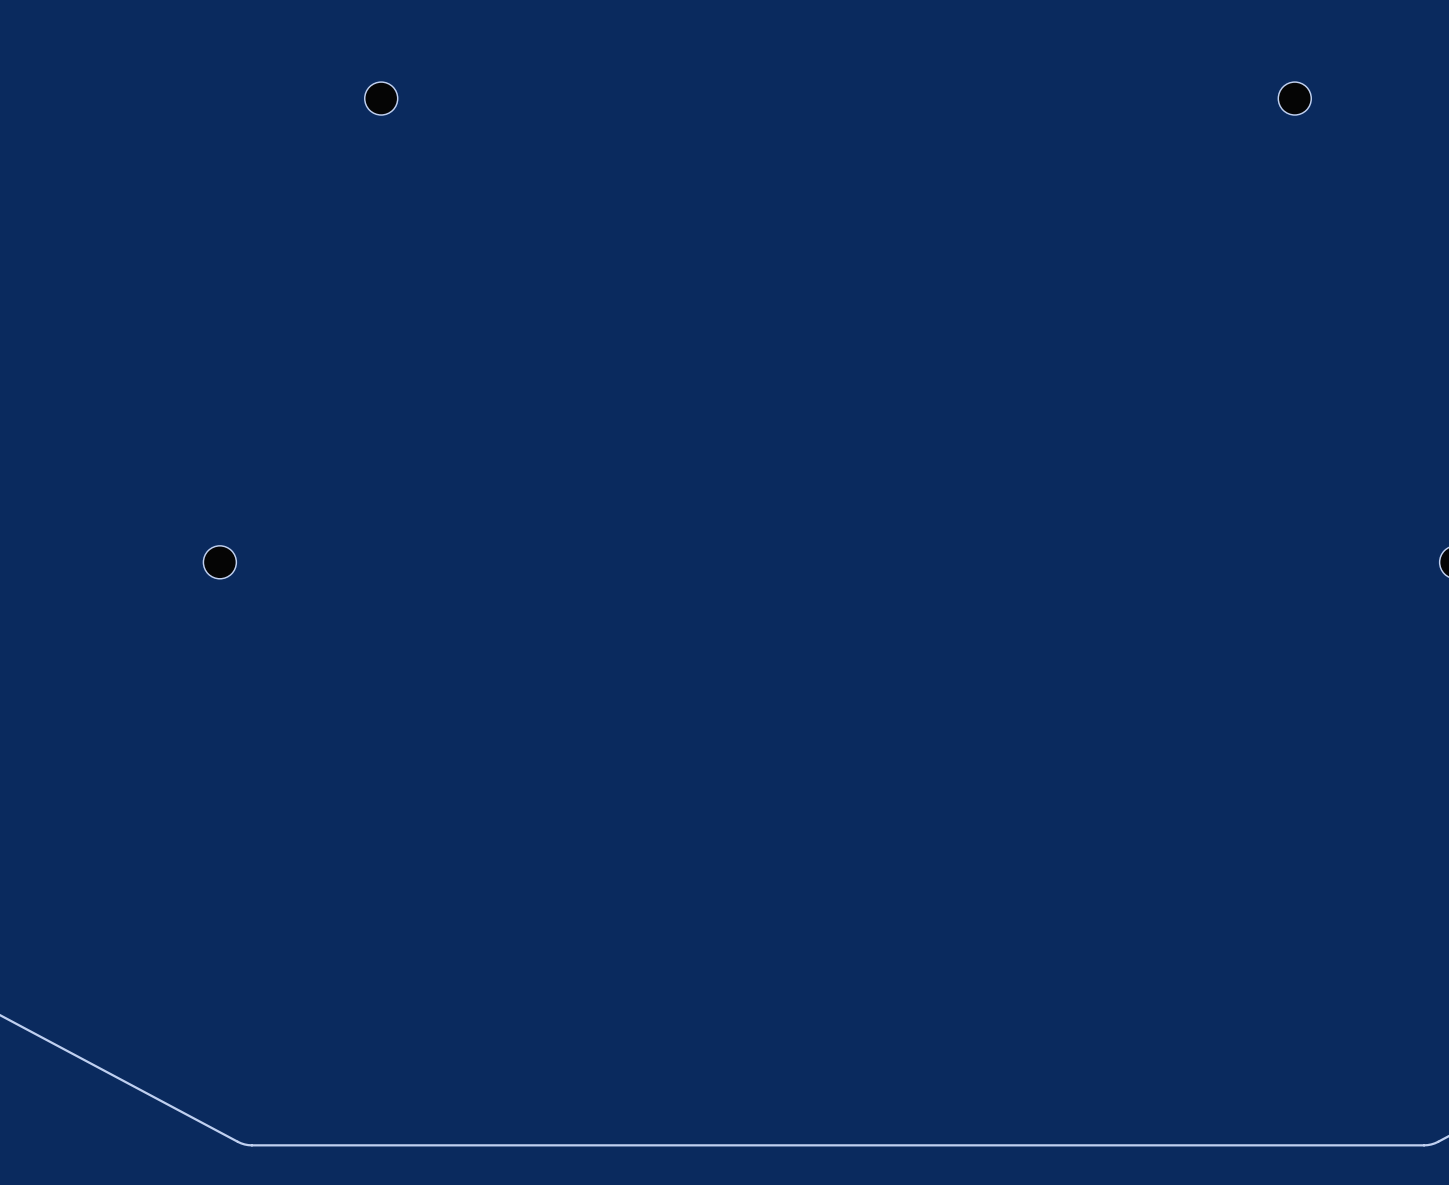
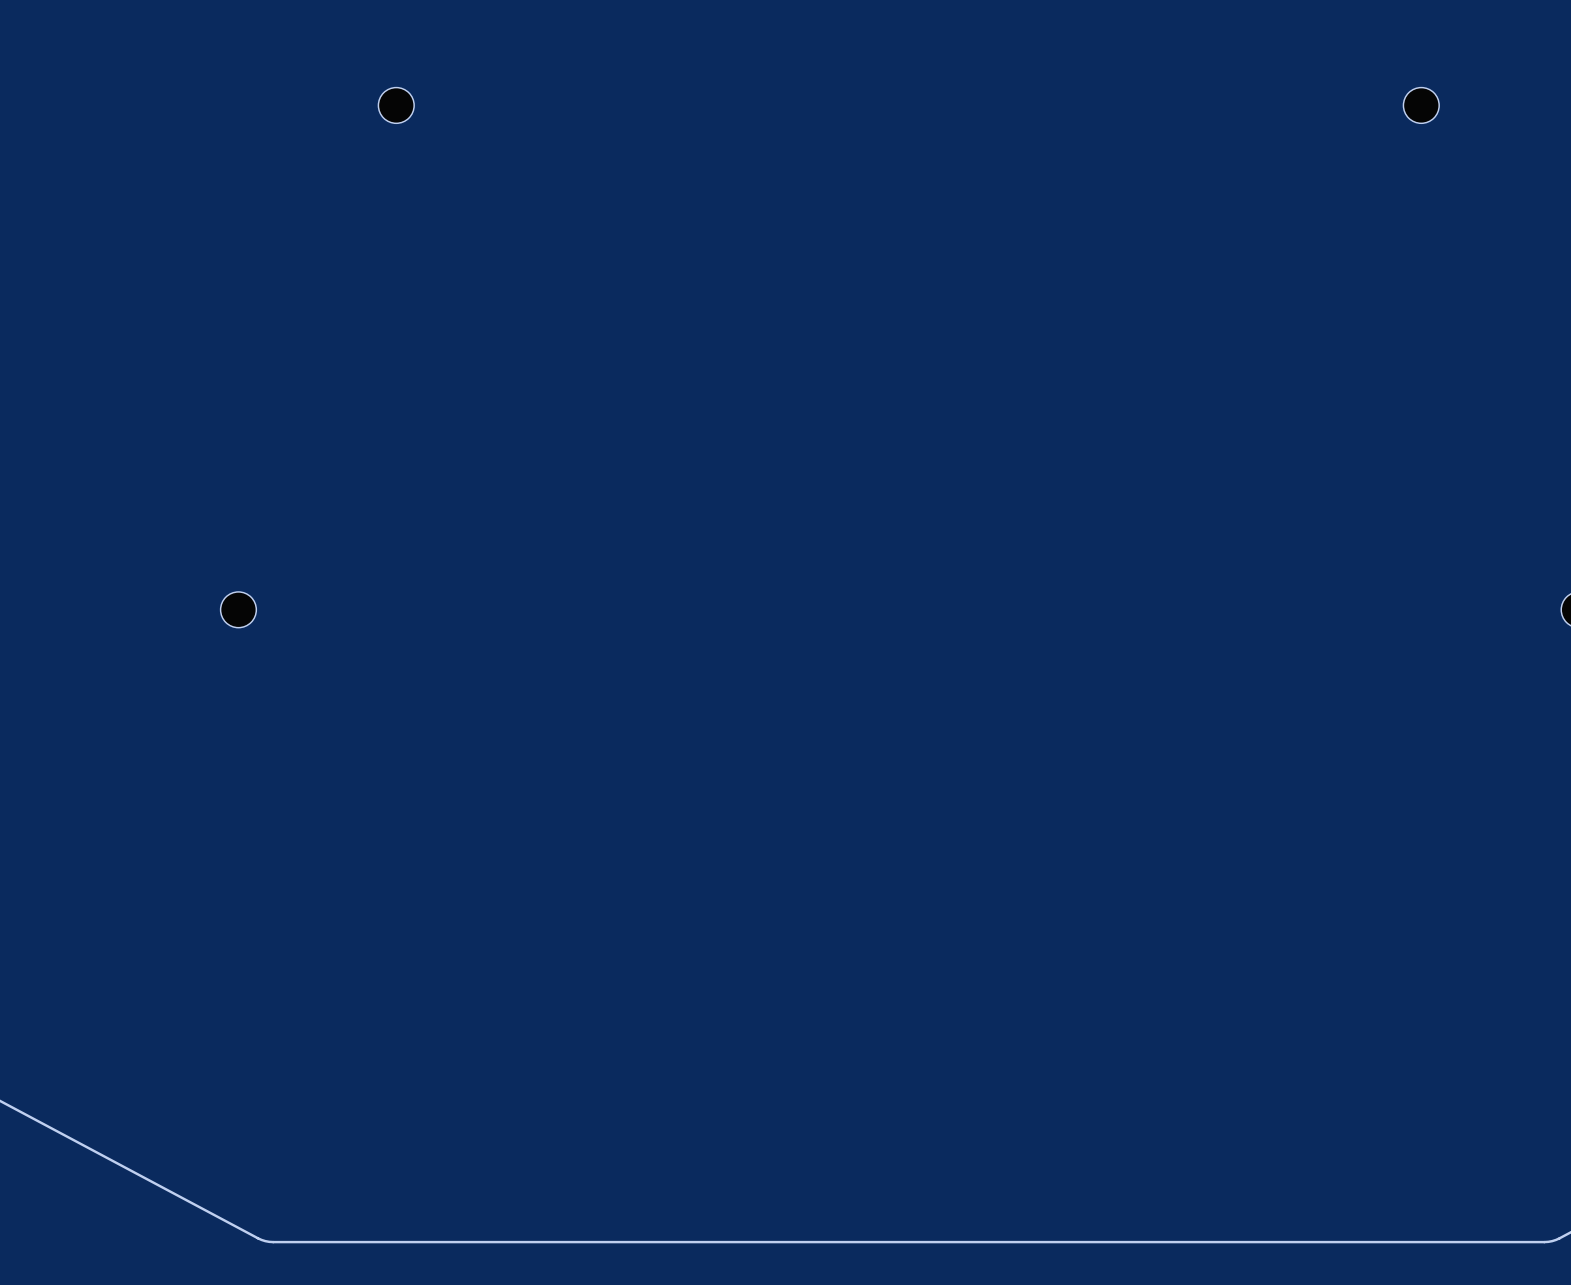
part position: (381, 98) -> (396, 105)
part position: (1294, 98) -> (1421, 105)

